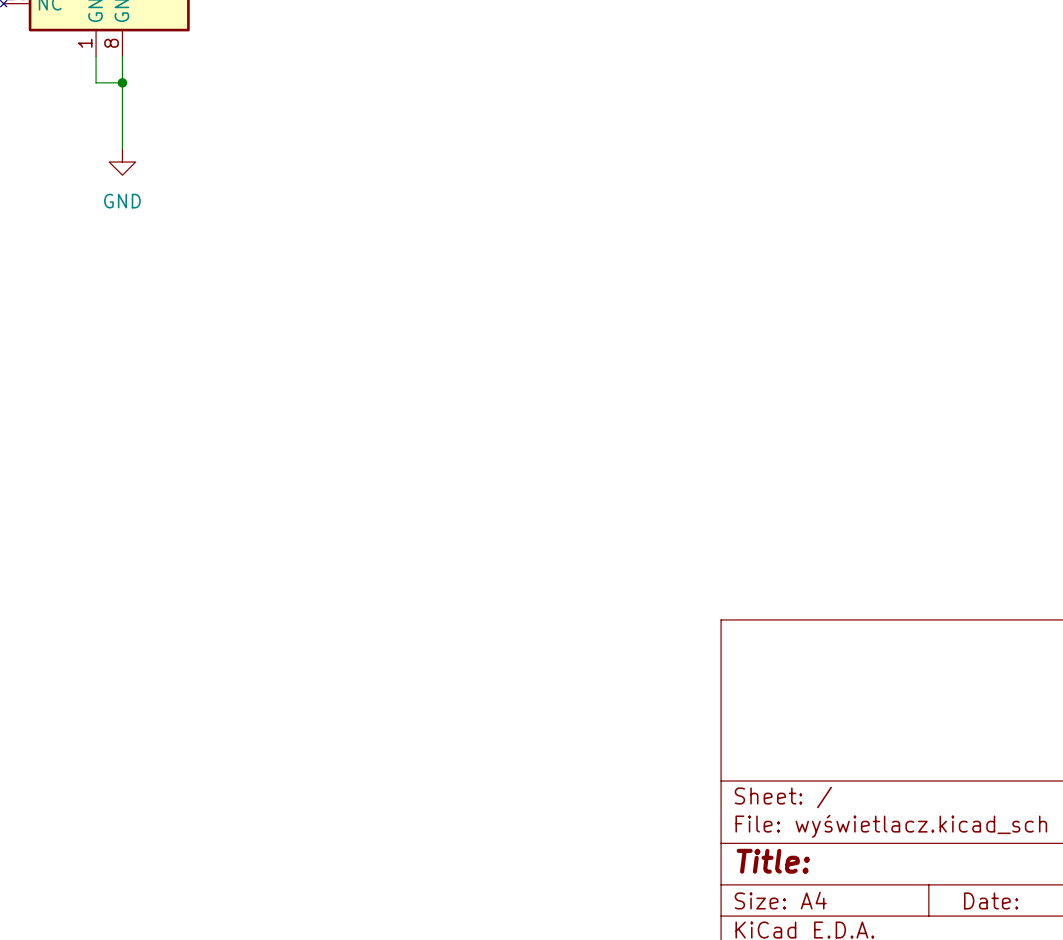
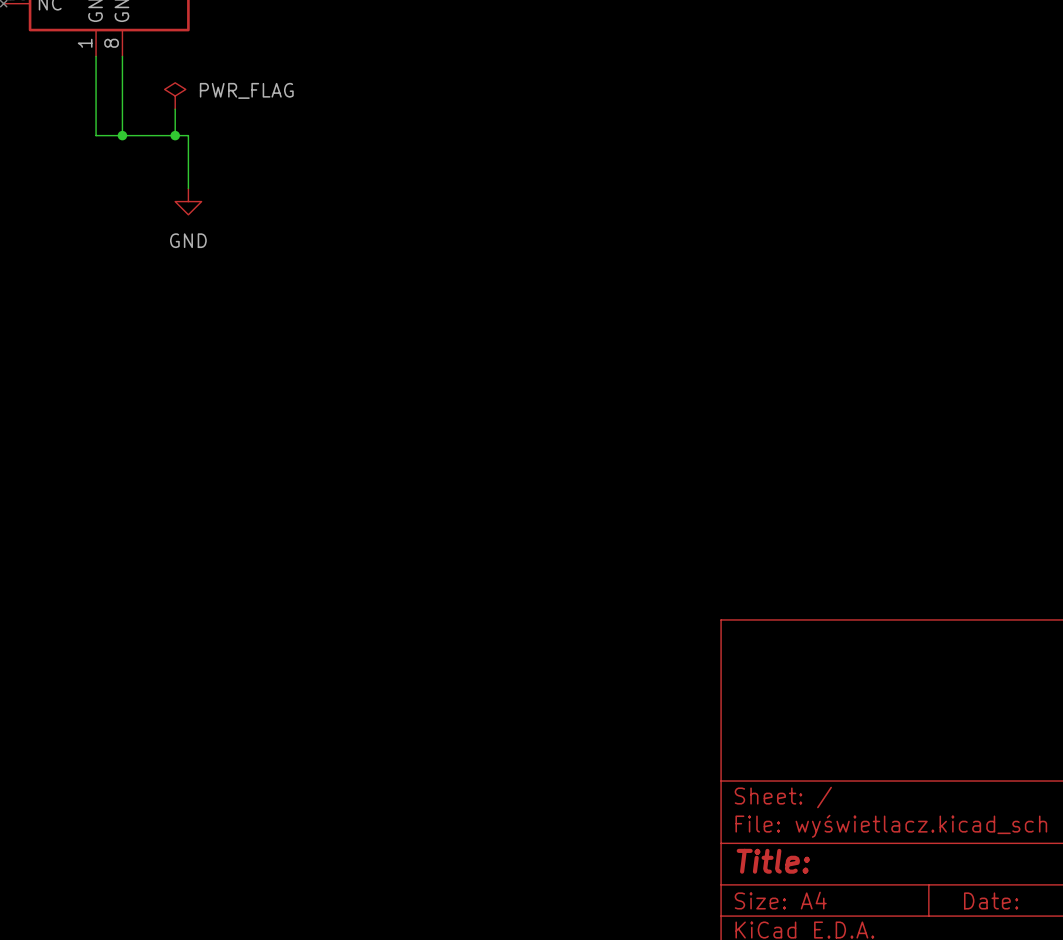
wire: (96, 82) (122, 82) -> (96, 82) (96, 135) (188, 135) (188, 188)
junction: (122, 82) -> none
power symbol: none -> PWR_FLAG (175, 96)
wire: none -> (175, 109) (175, 135)
wire: (122, 135) (122, 148) -> none
junction: none -> (122, 135)
junction: none -> (175, 135)
power symbol position: GND (122, 162) -> GND (188, 201)

